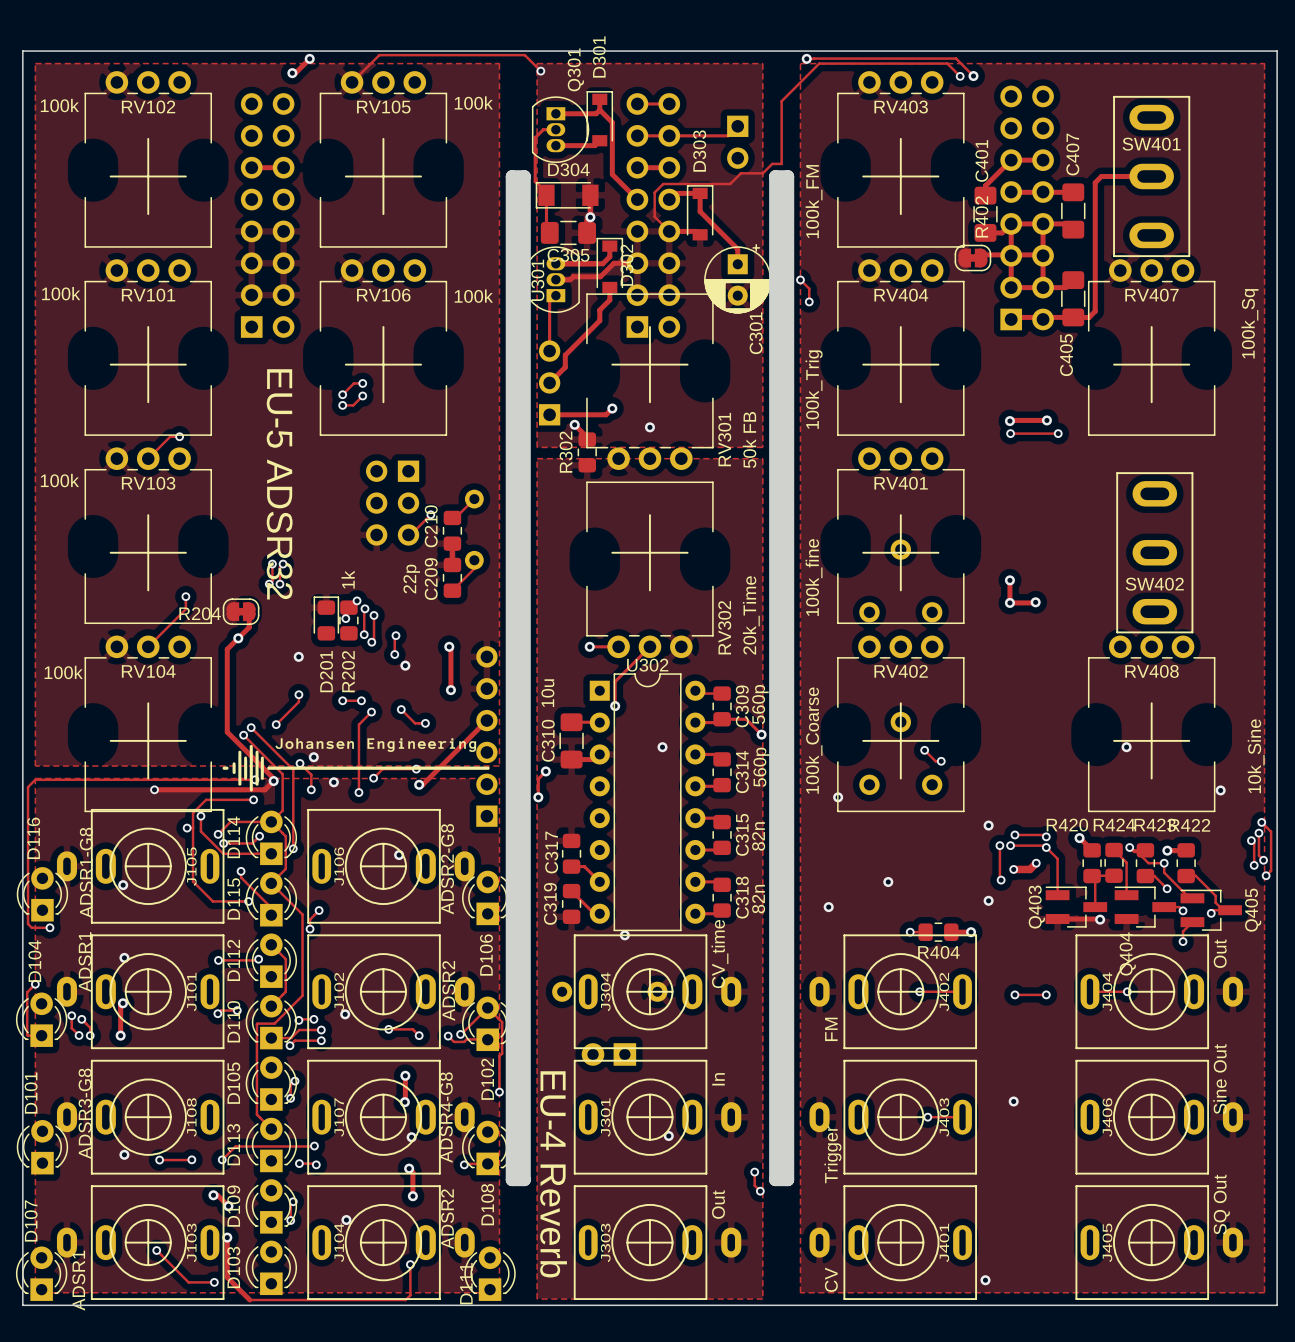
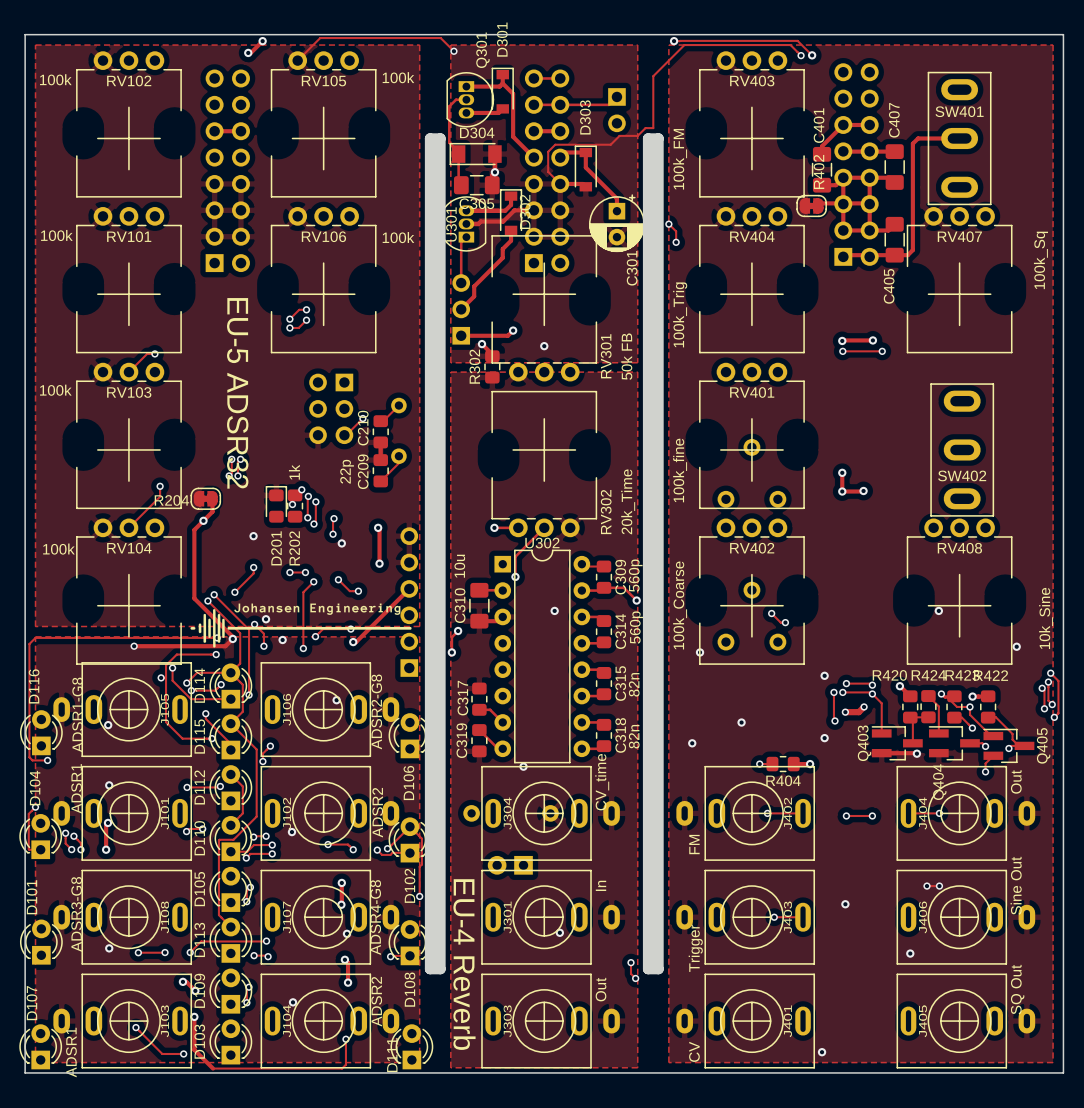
track: none -> (927, 886) (939, 886)
via: none -> (927, 886)
via: none -> (939, 886)
via: none -> (910, 953)

